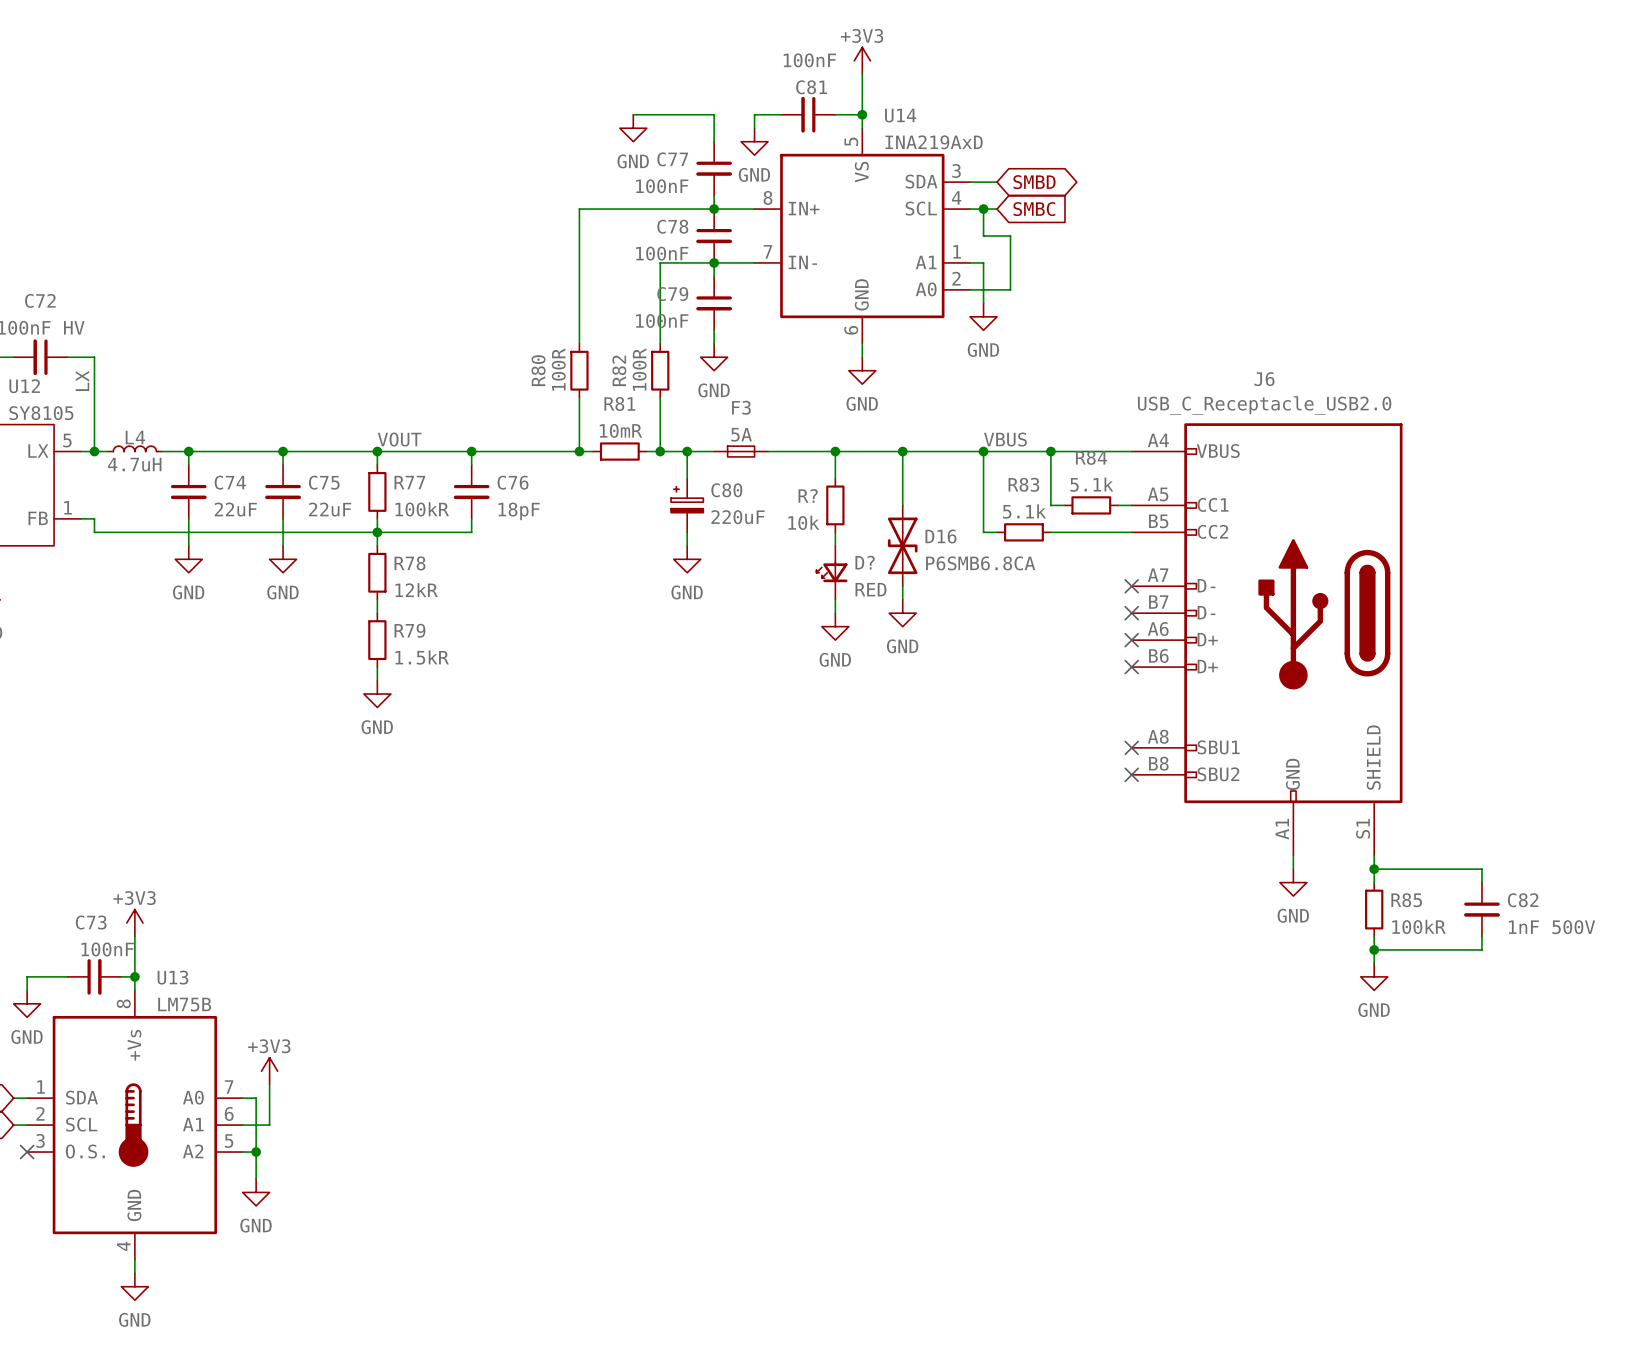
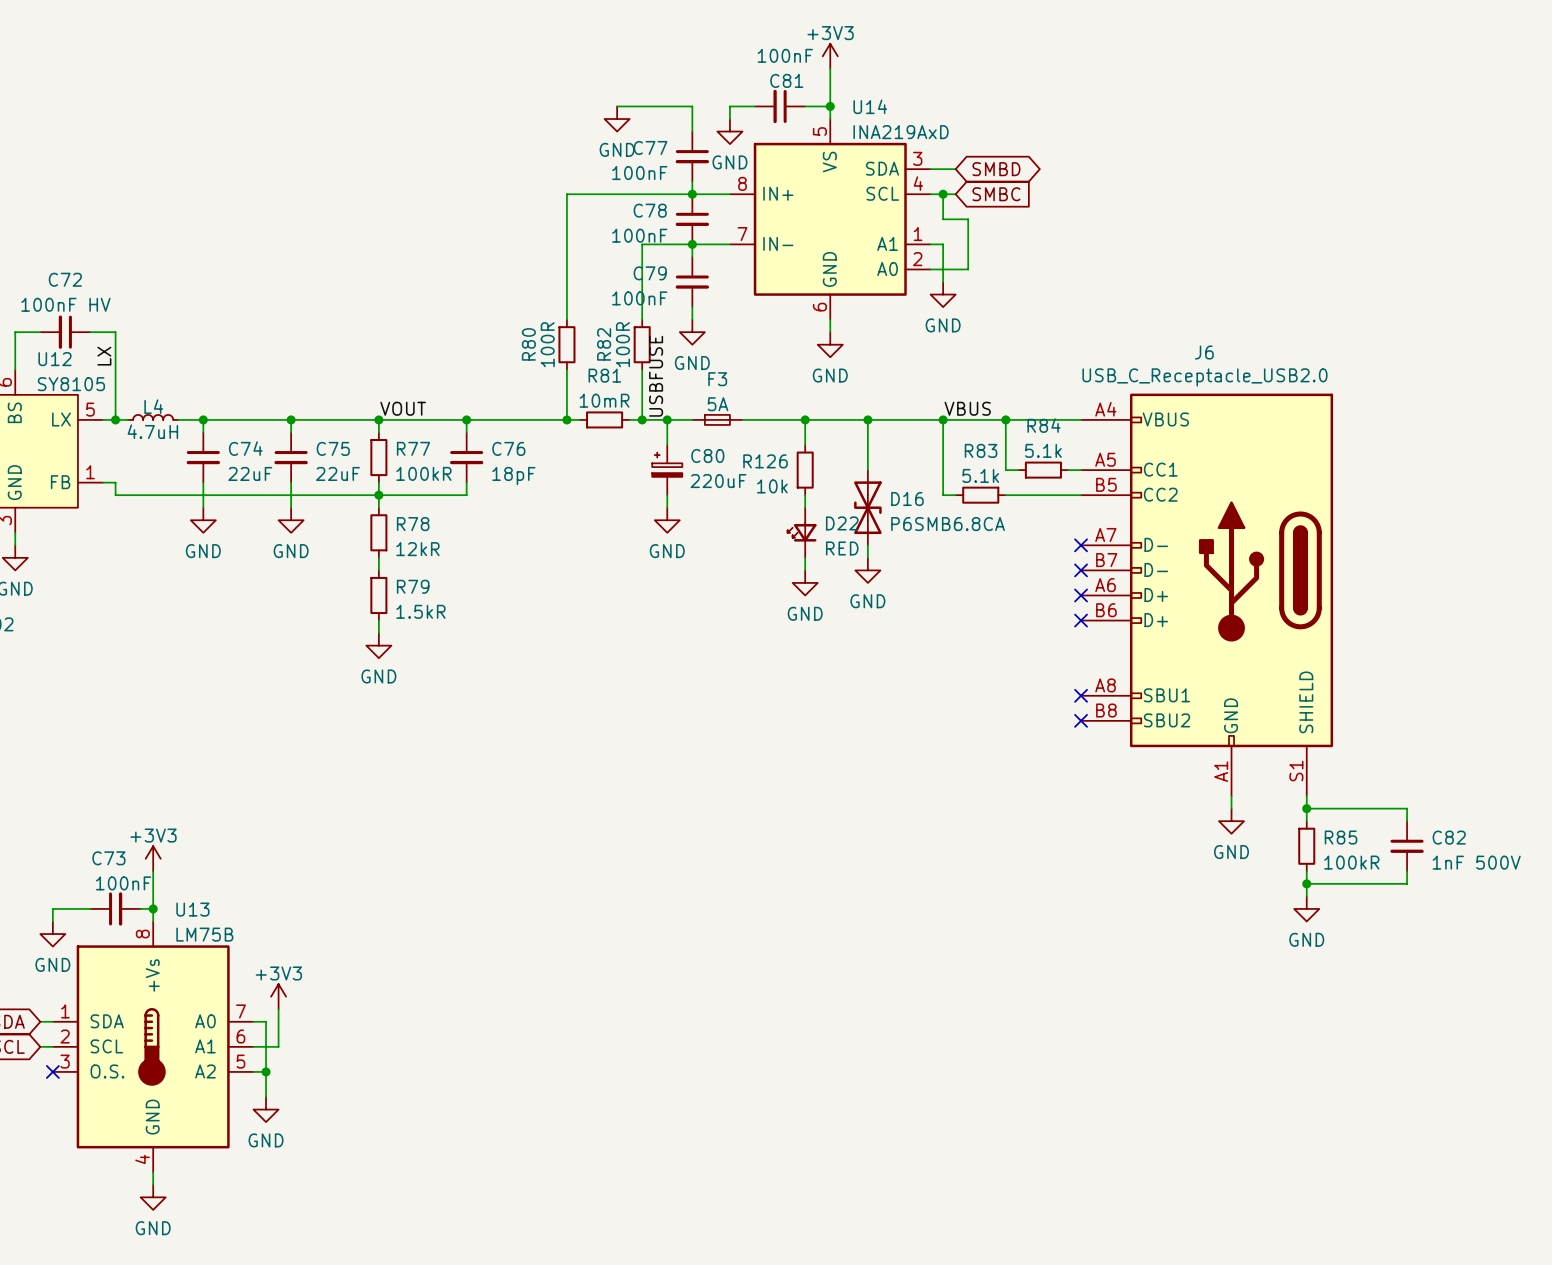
label: none -> USBFUSE (656, 376)
R? name: R? (808, 495) -> R126 (765, 461)
D? name: D? (865, 562) -> D22 (842, 523)

